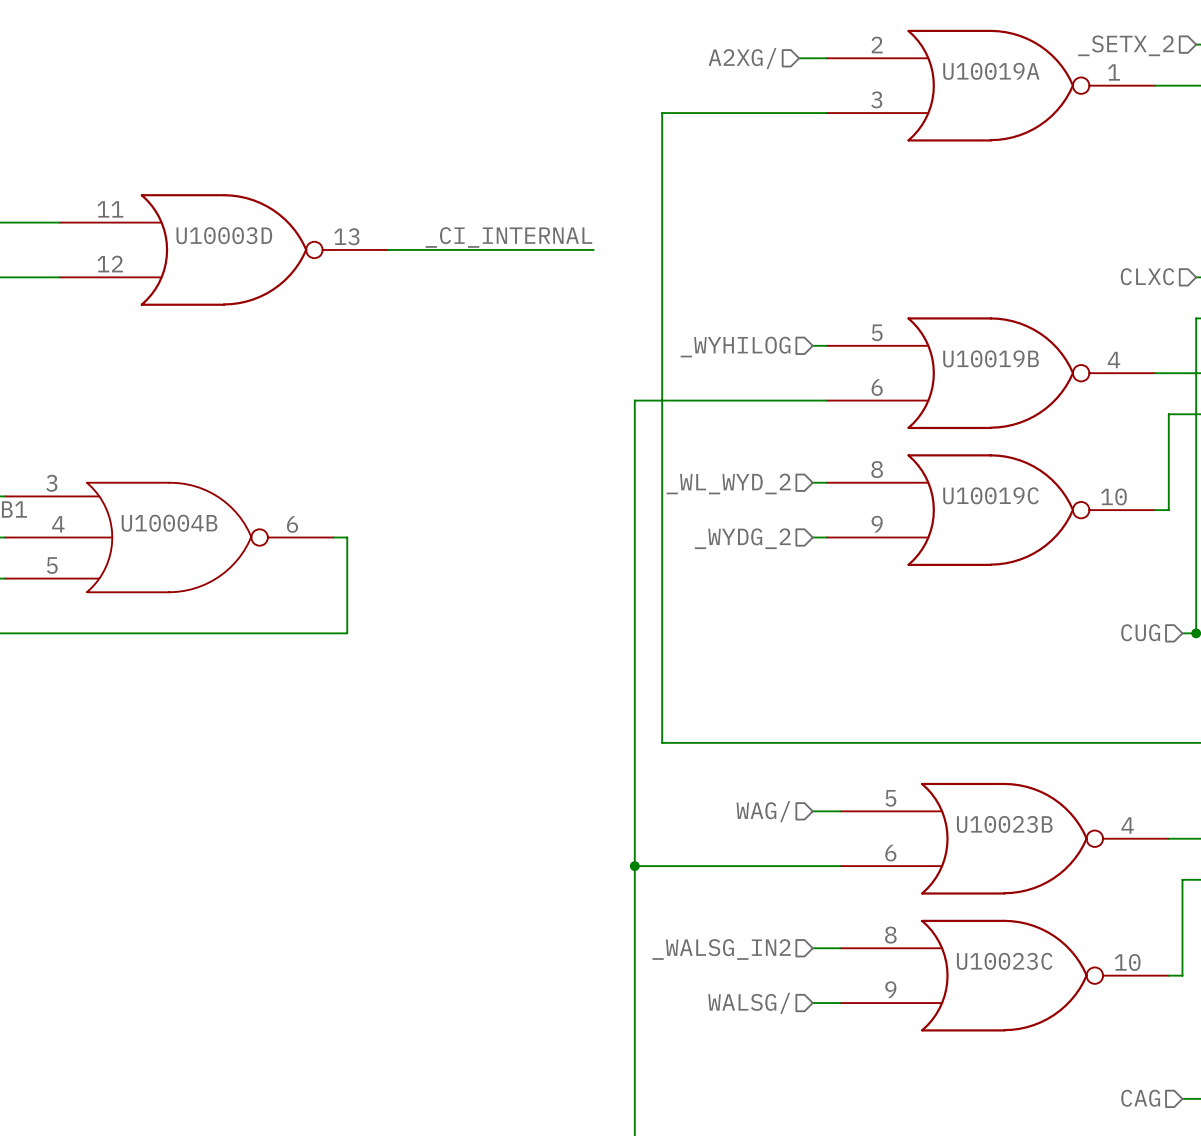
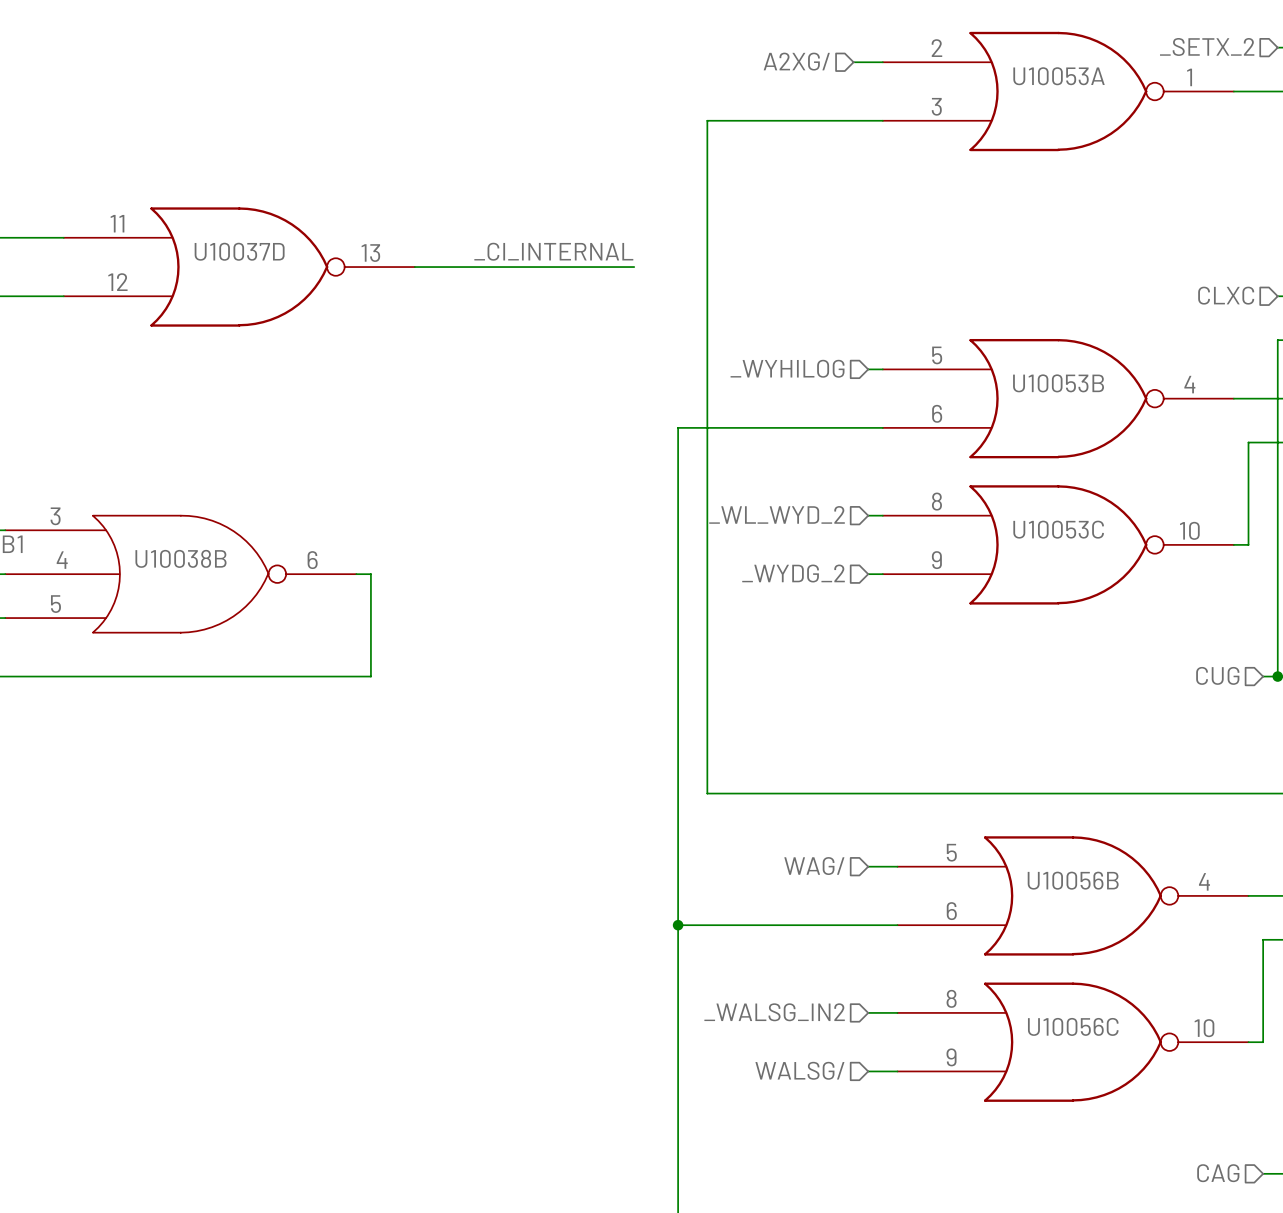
U10019A name: U10019A (991, 71) -> U10053A (1059, 76)
U10003D name: U10003D (224, 235) -> U10037D (239, 251)
U10019B name: U10019B (991, 358) -> U10053B (1058, 383)
U10019C name: U10019C (991, 495) -> U10053C (1058, 529)
U10004B name: U10004B (169, 523) -> U10038B (180, 558)
U10023B name: U10023B (1004, 824) -> U10056B (1073, 880)
U10023C name: U10023C (1004, 961) -> U10056C (1073, 1026)

